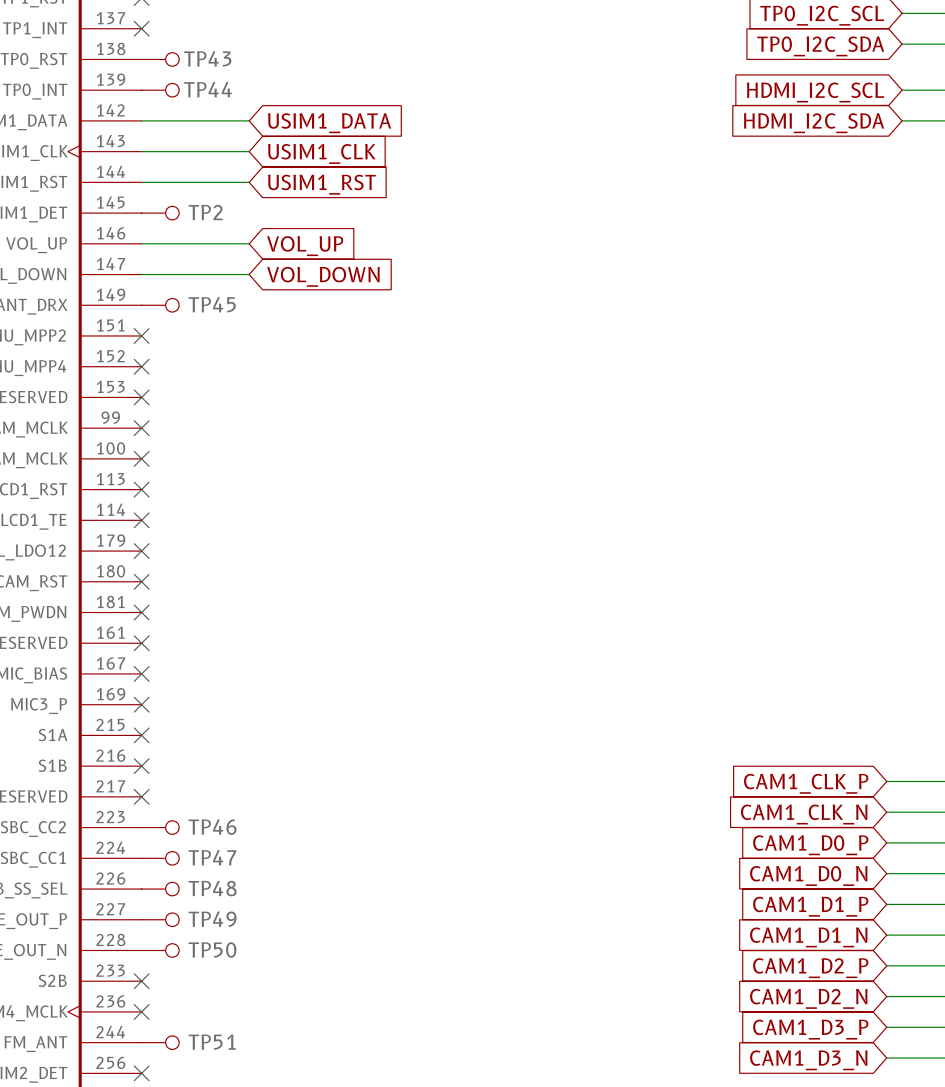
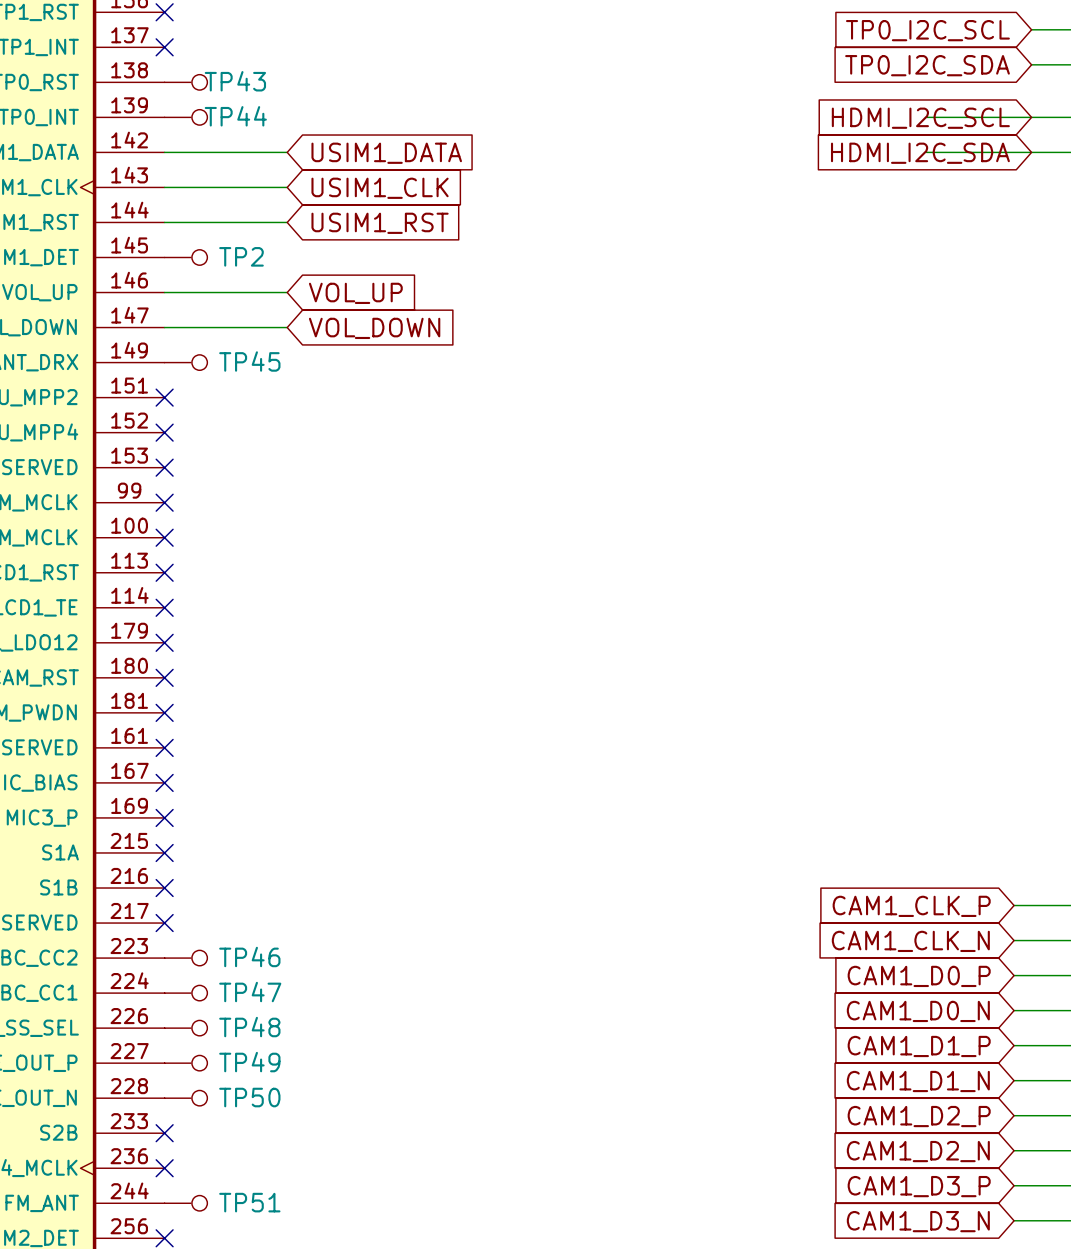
wire: none -> (926, 117) (1031, 117)
wire: none -> (926, 152) (1031, 152)

